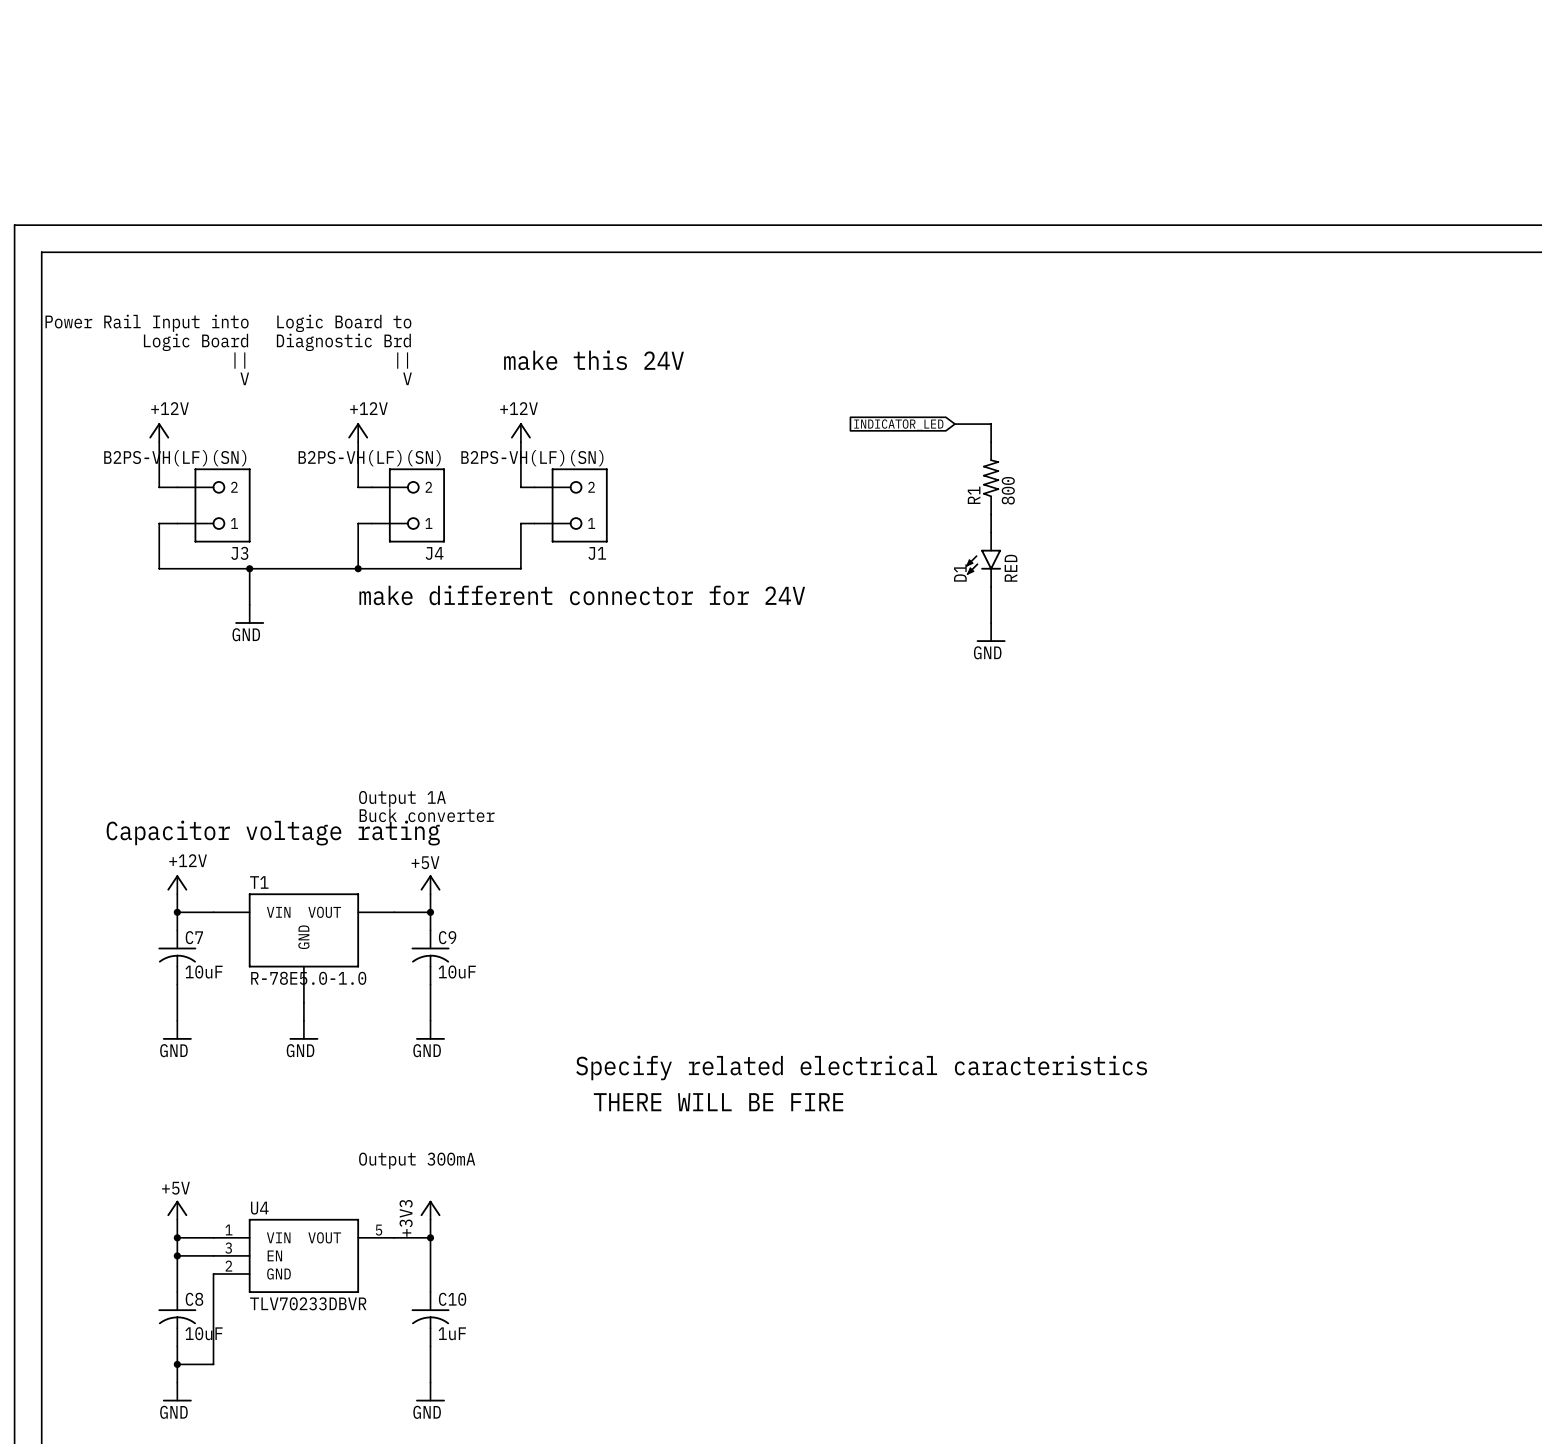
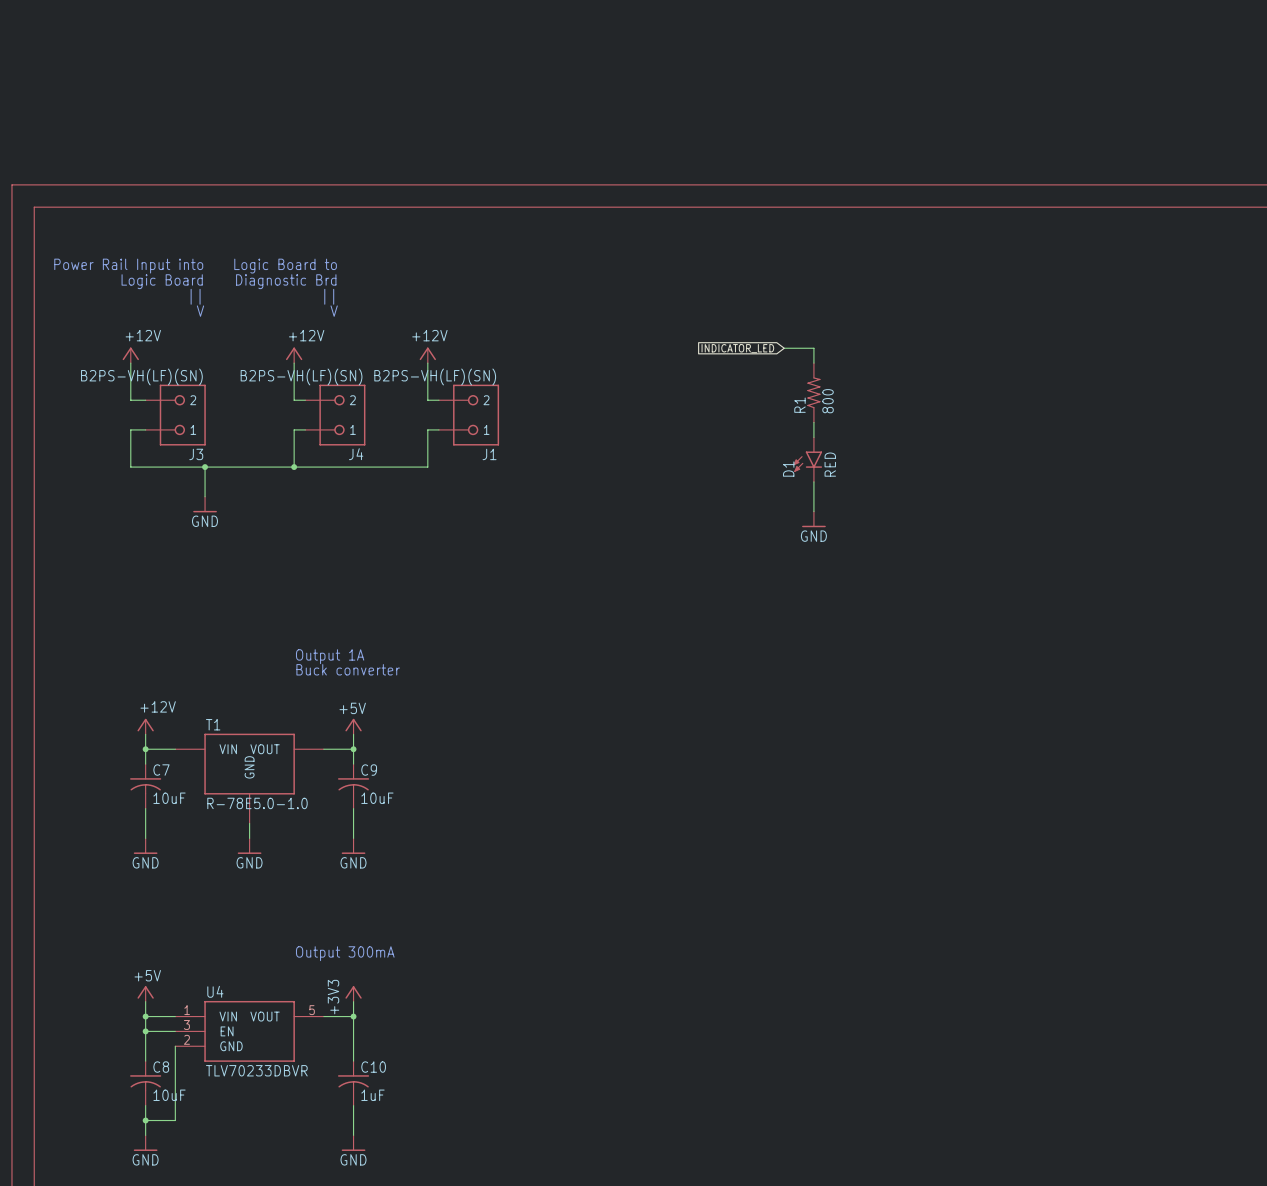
text: make this 24V (594, 360) -> none
text: make different connector for 24V (582, 595) -> none
text: Capacitor voltage rating (273, 833) -> none
text: Specify related electrical caracteristics (861, 1067) -> none
text: THERE WILL BE FIRE (718, 1102) -> none

